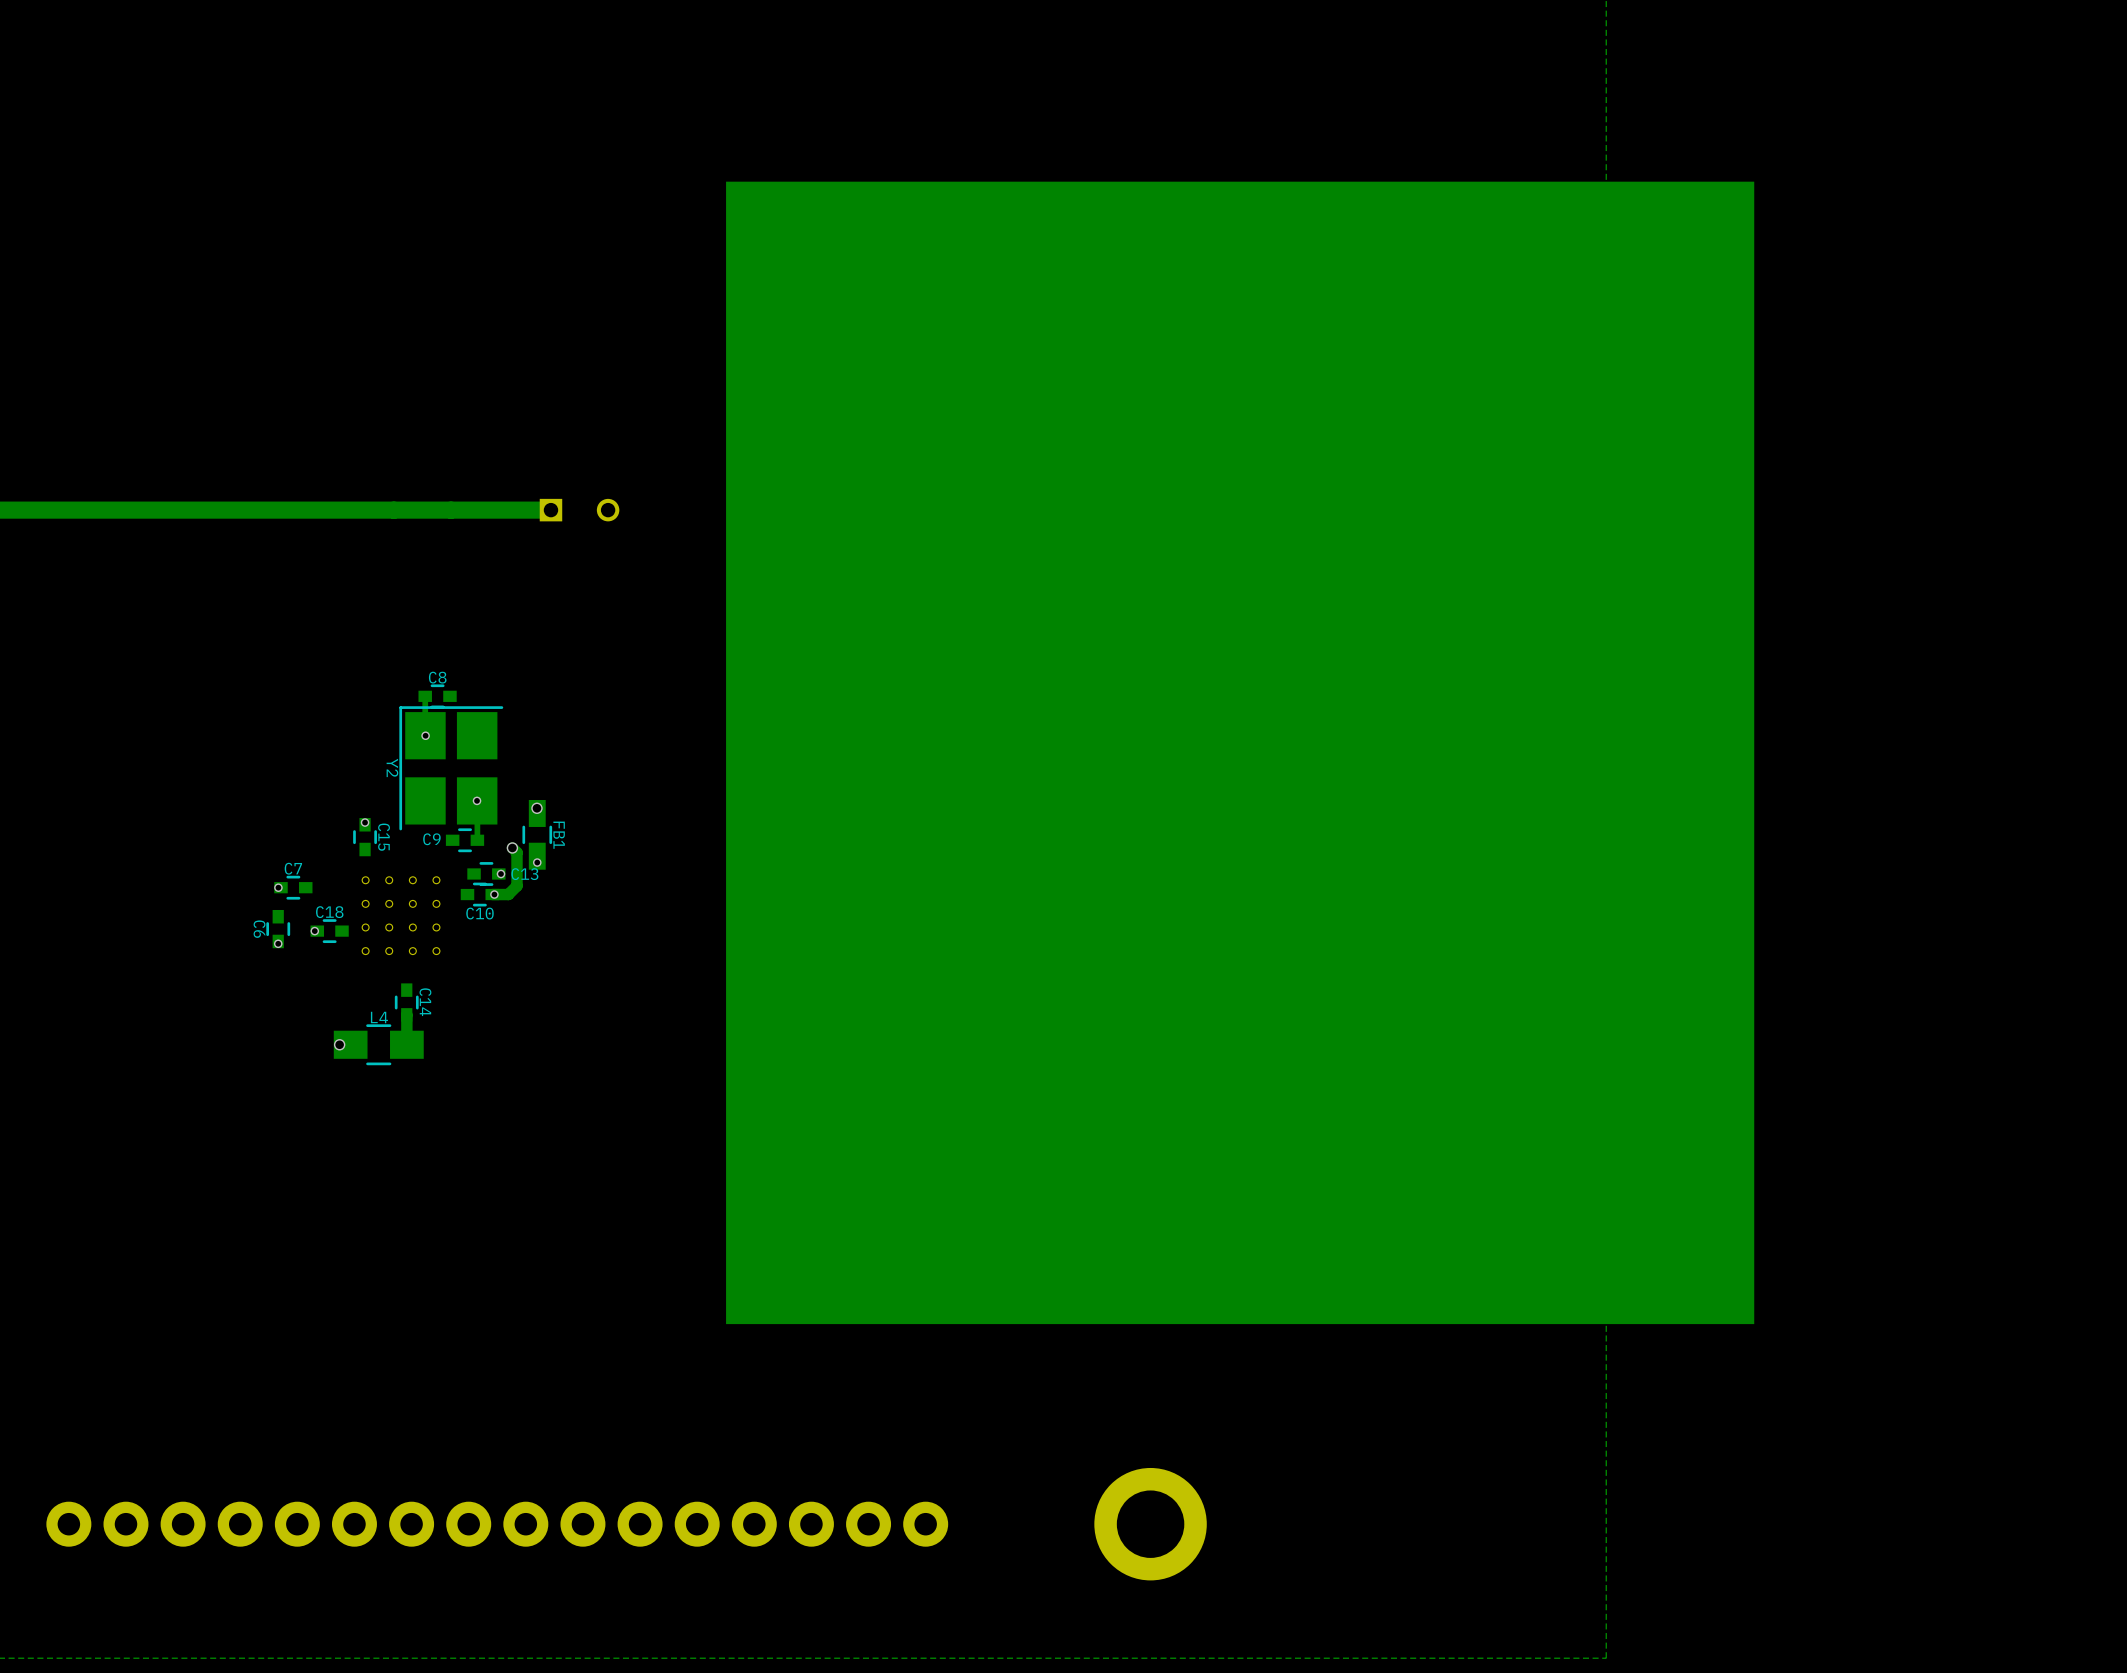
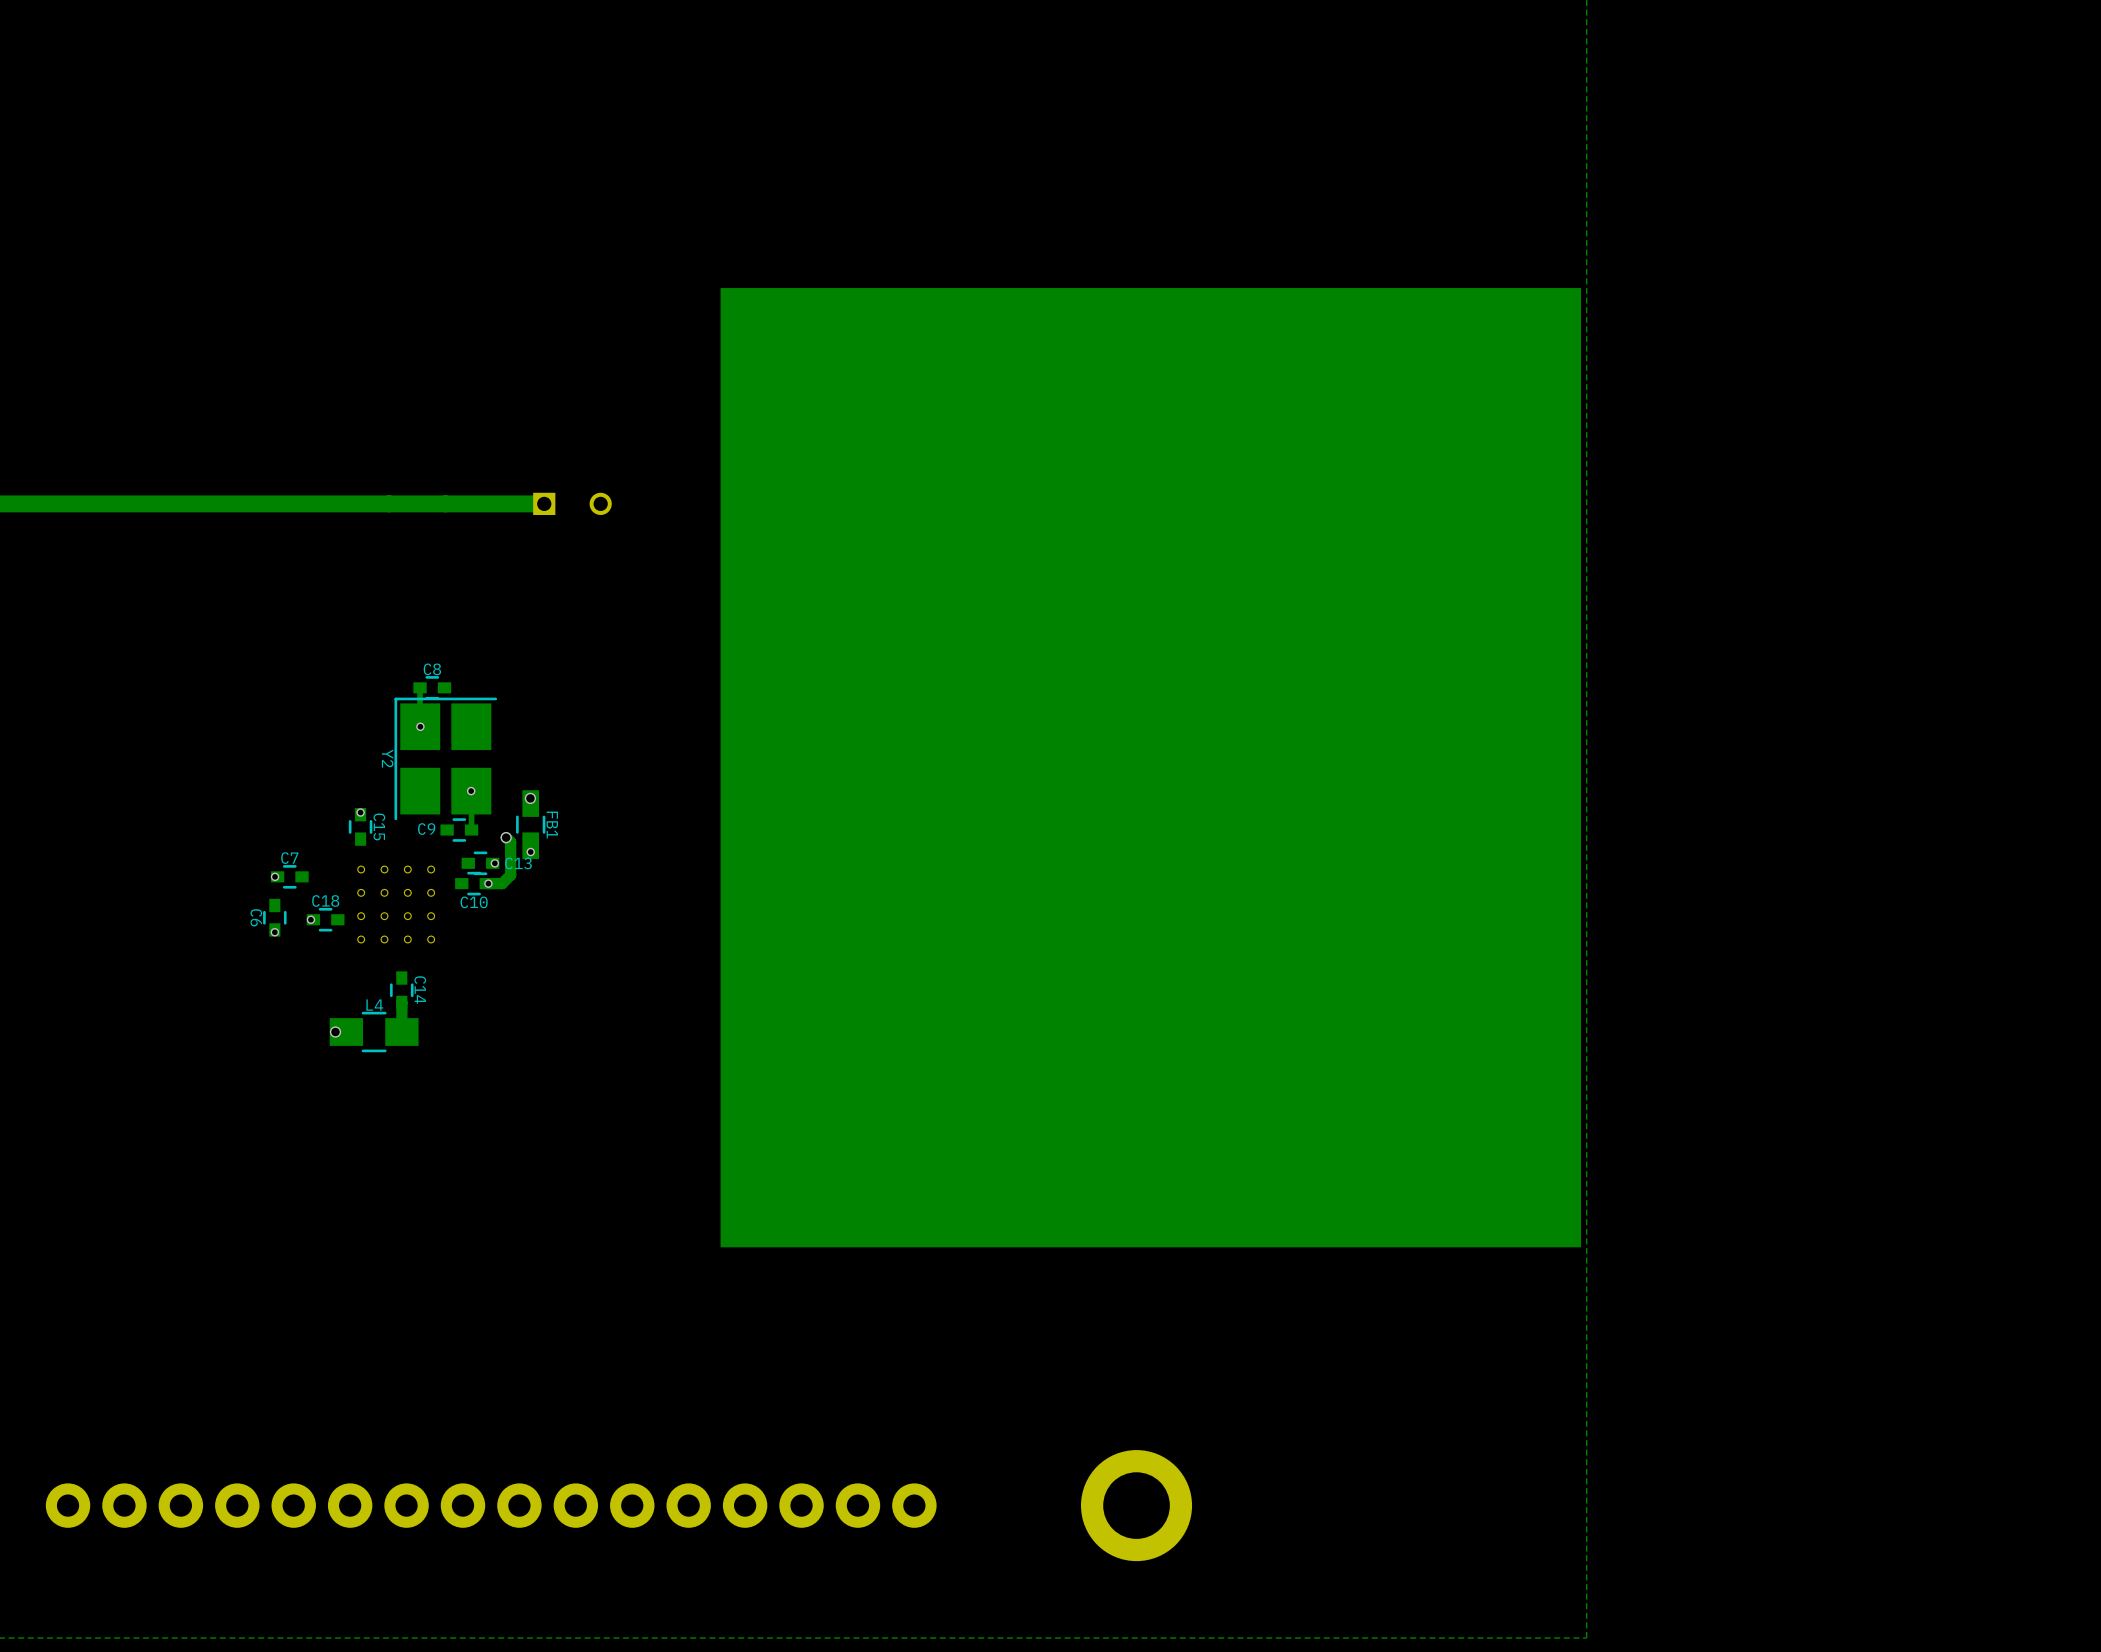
part: (1240, 752) -> none
part: none -> (1150, 767)

